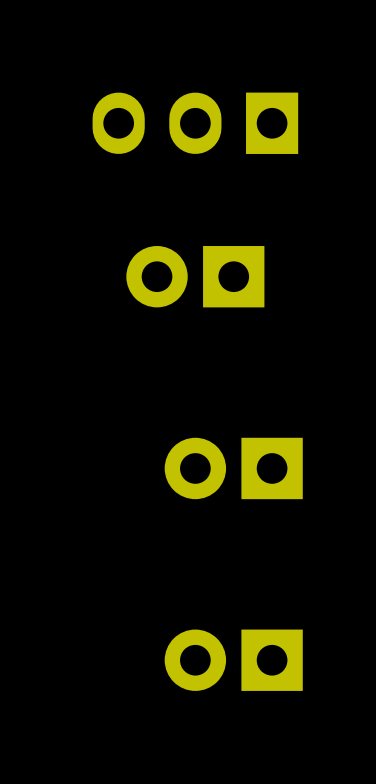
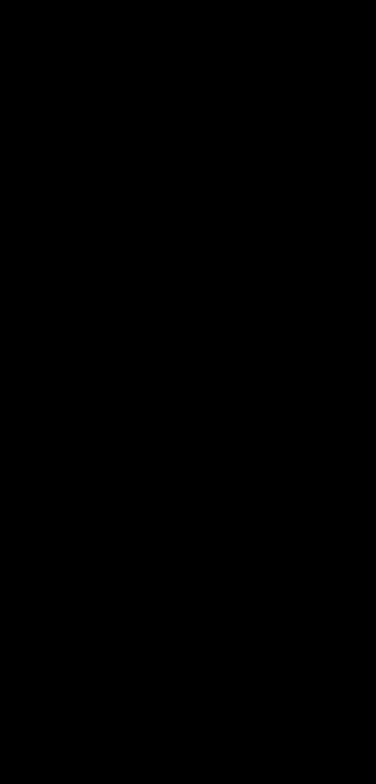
part: (195, 123) -> none
part: (195, 276) -> none
part: (233, 468) -> none
part: (233, 660) -> none

